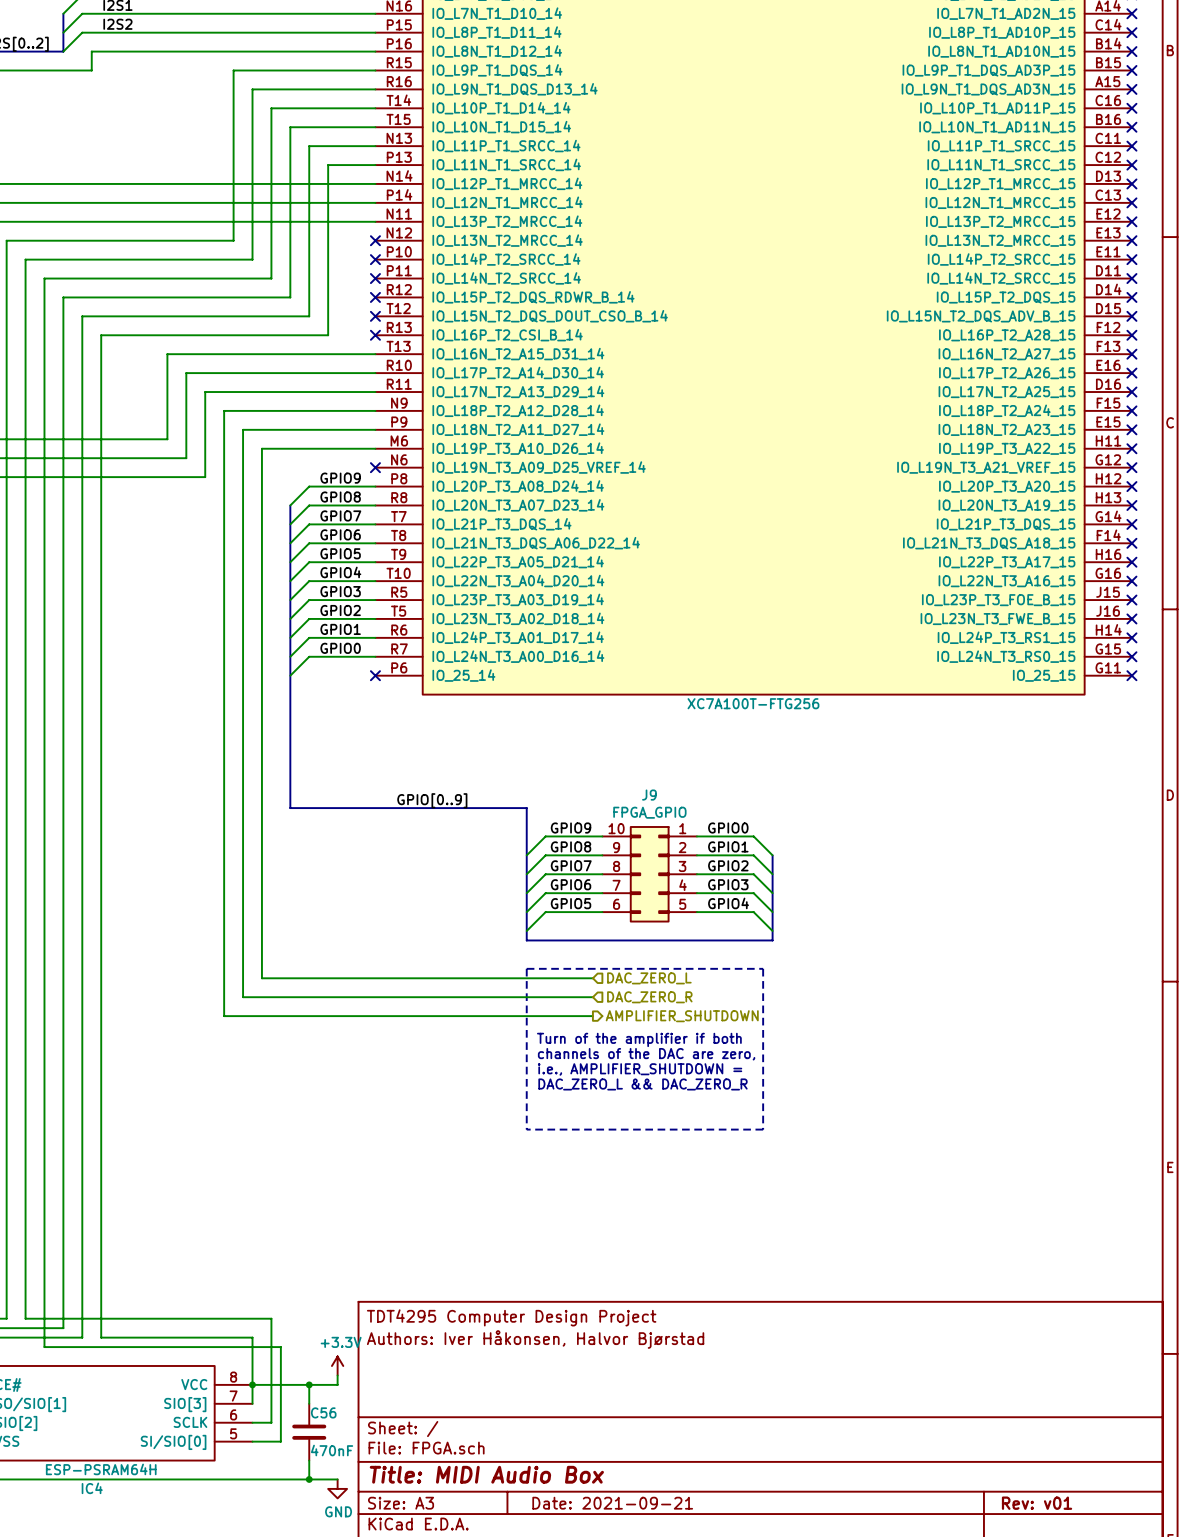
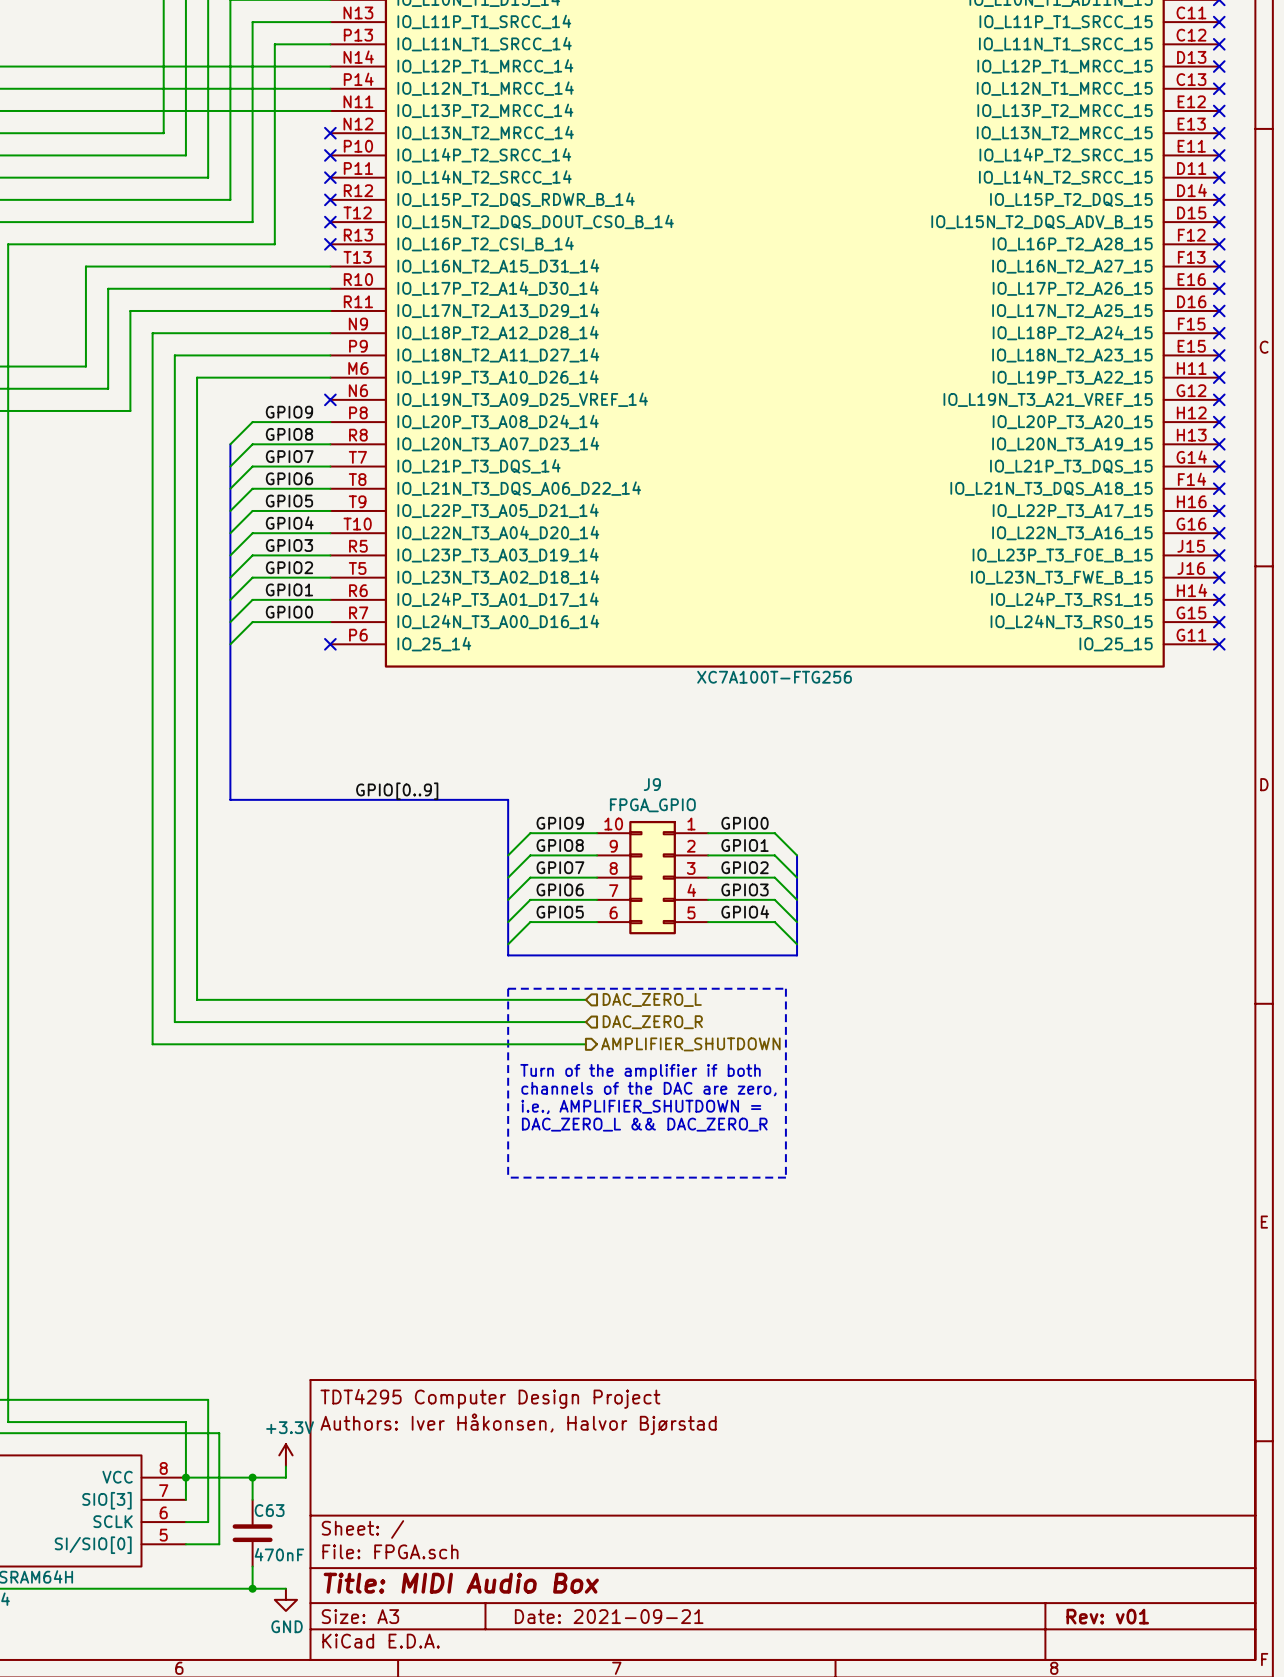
C56 name: C56 (323, 1412) -> C63 (269, 1510)

